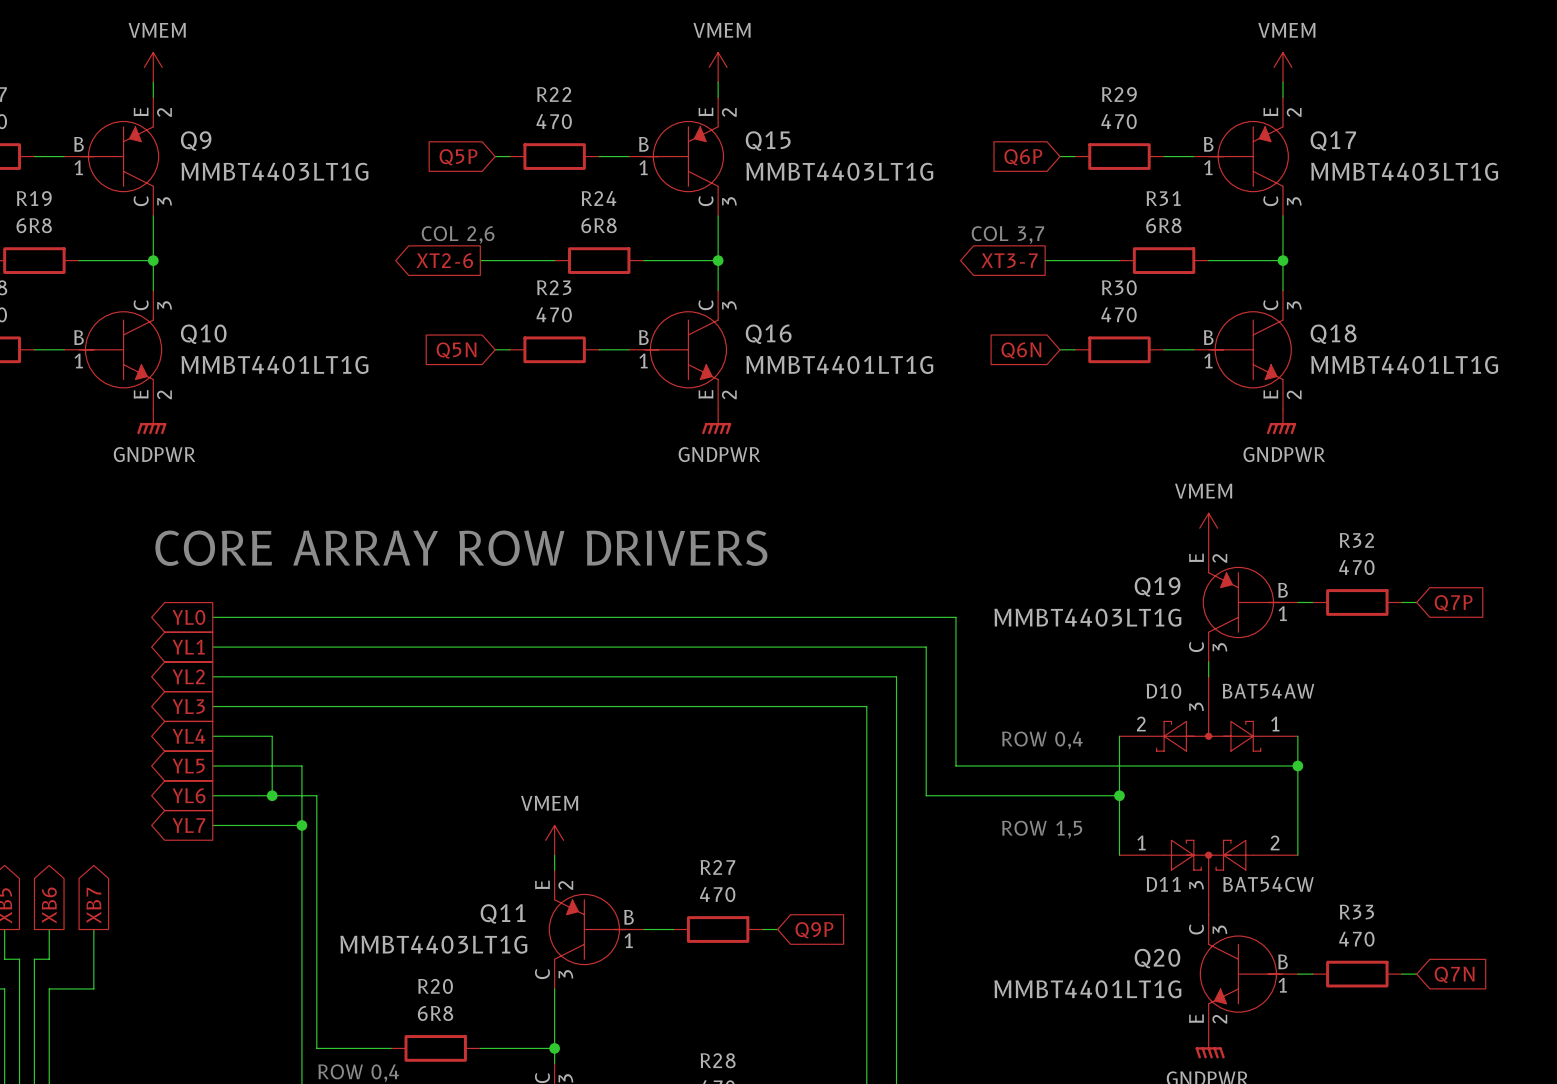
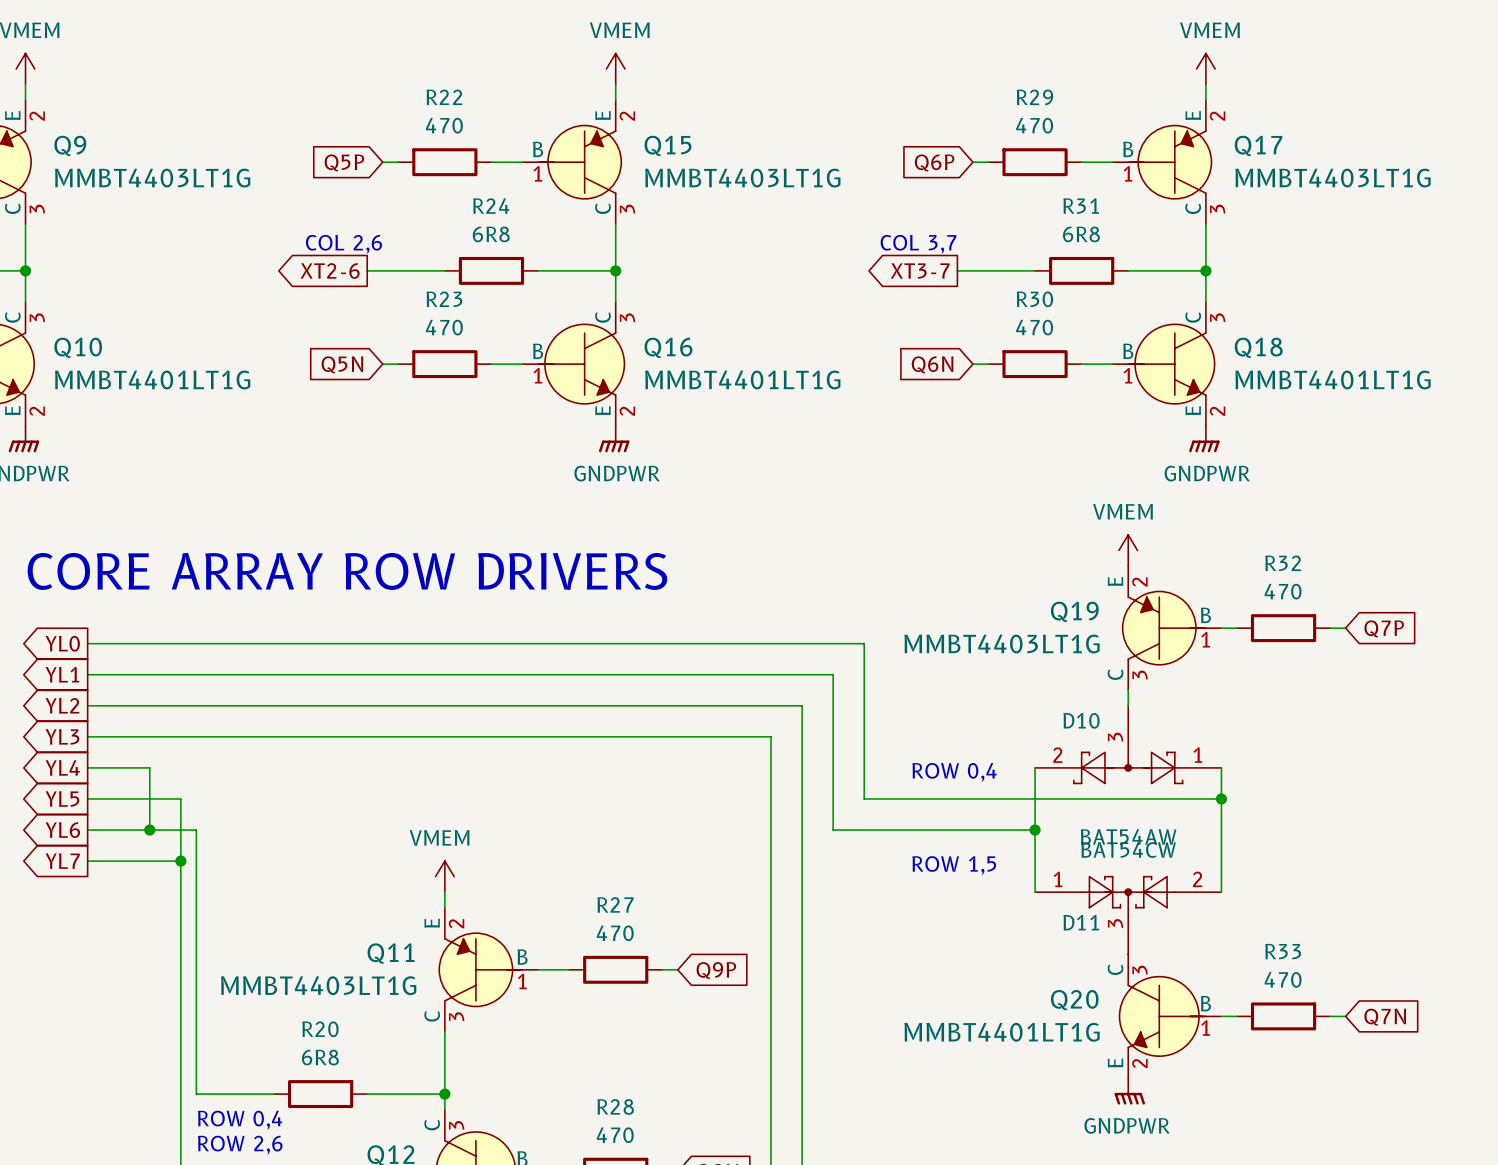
D10 value position: BAT54AW (1268, 691) -> BAT54AW (1128, 836)
D11 value position: BAT54CW (1268, 884) -> BAT54CW (1128, 850)

